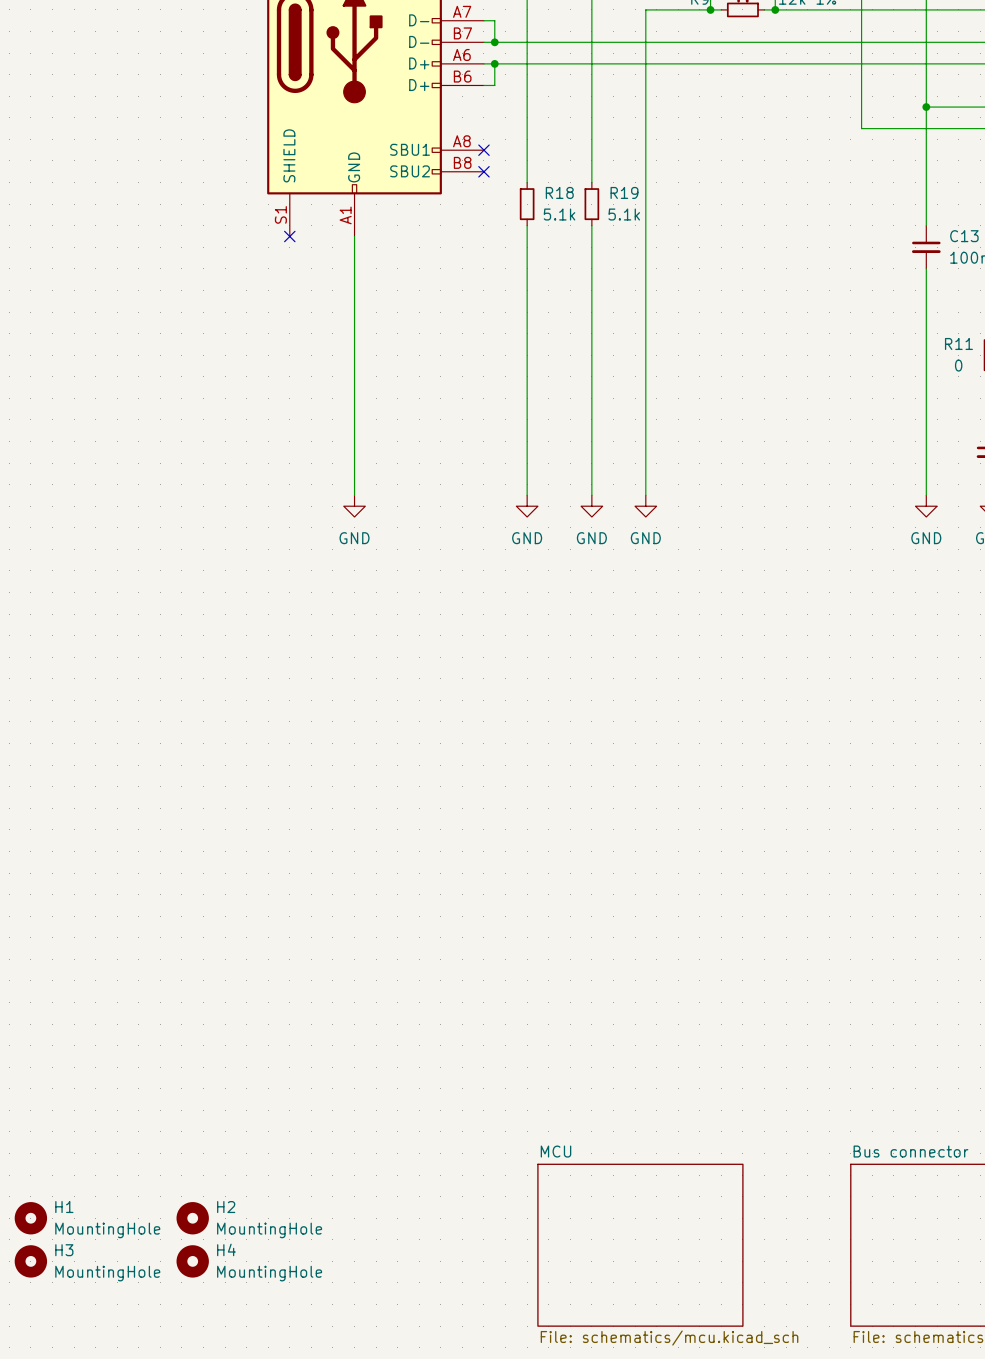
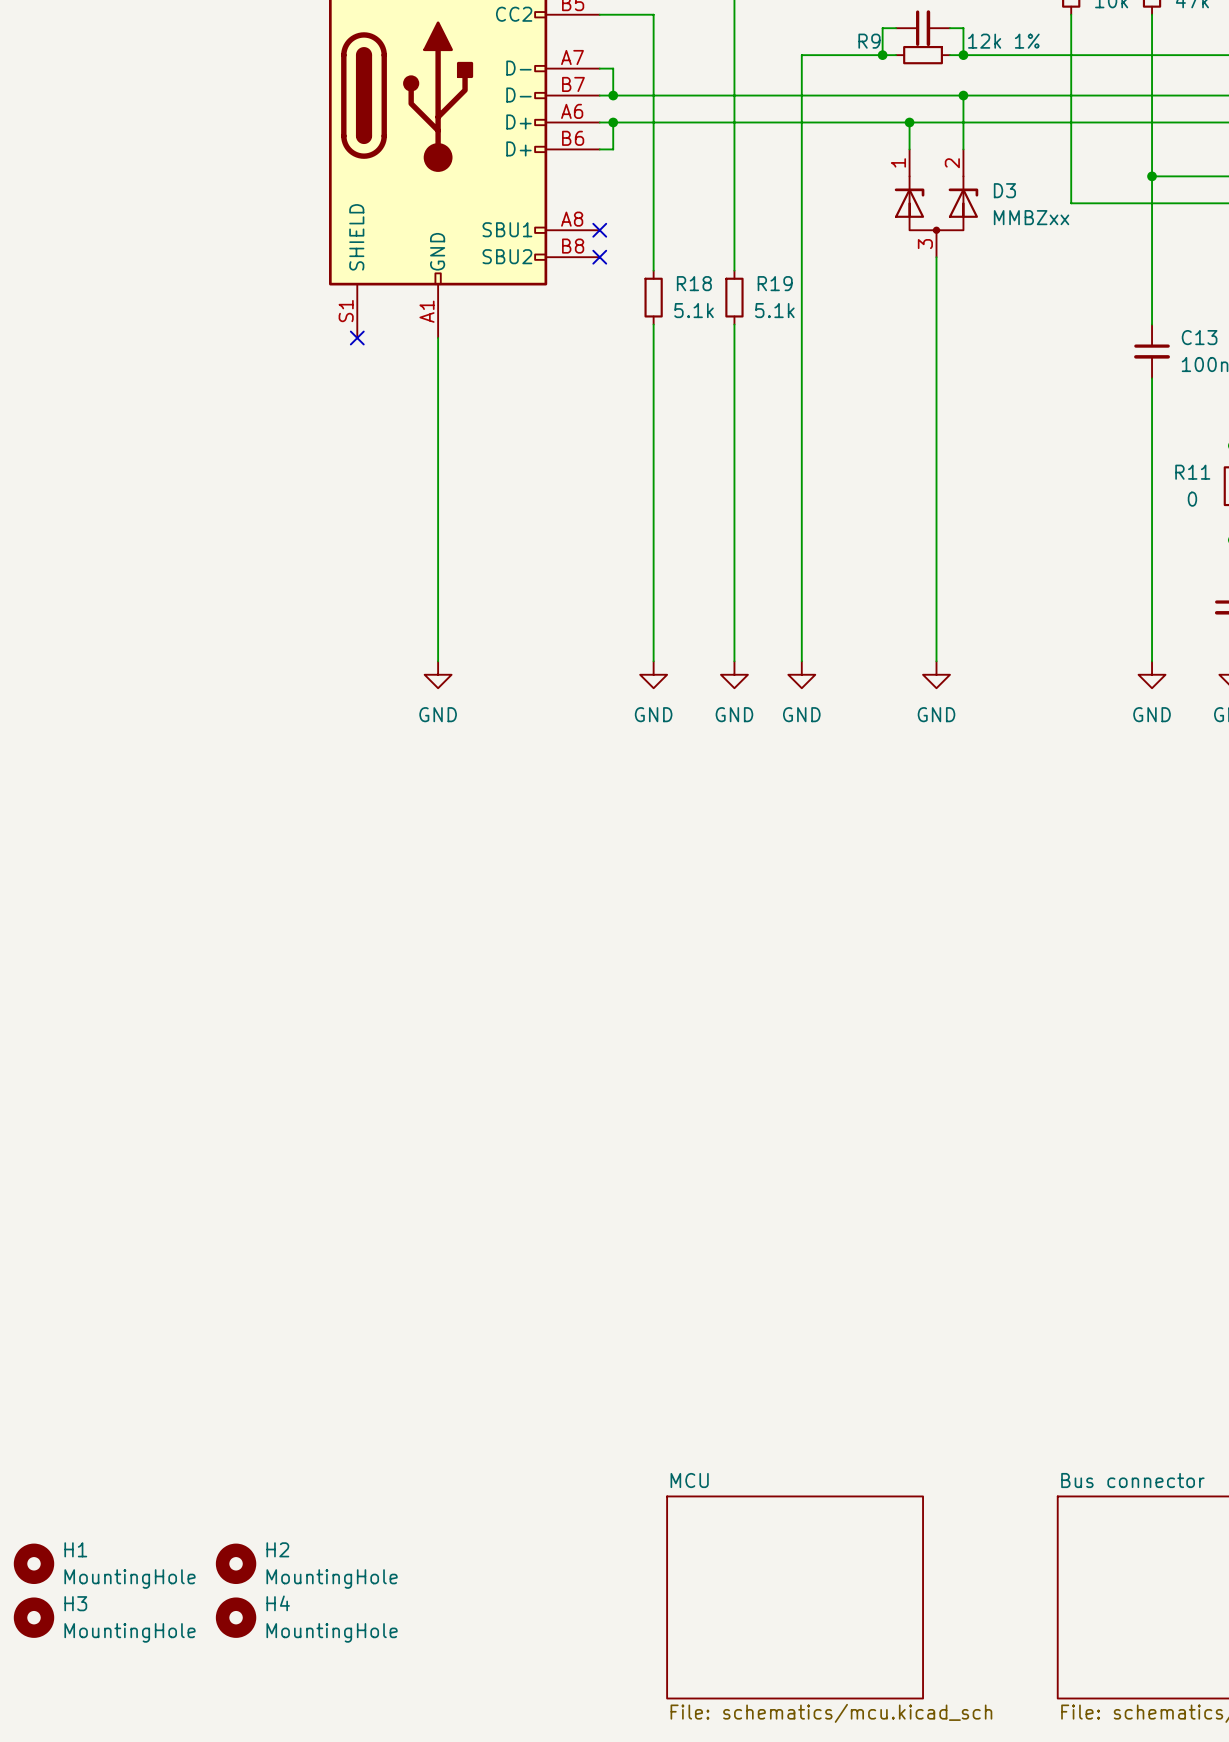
wire: none -> (963, 95) (963, 149)
junction: none -> (963, 95)
wire: none -> (909, 122) (909, 149)
junction: none -> (909, 122)
D3: none -> MMBZxx (936, 203)
wire: none -> (936, 257) (936, 661)
power symbol: none -> GND (936, 674)

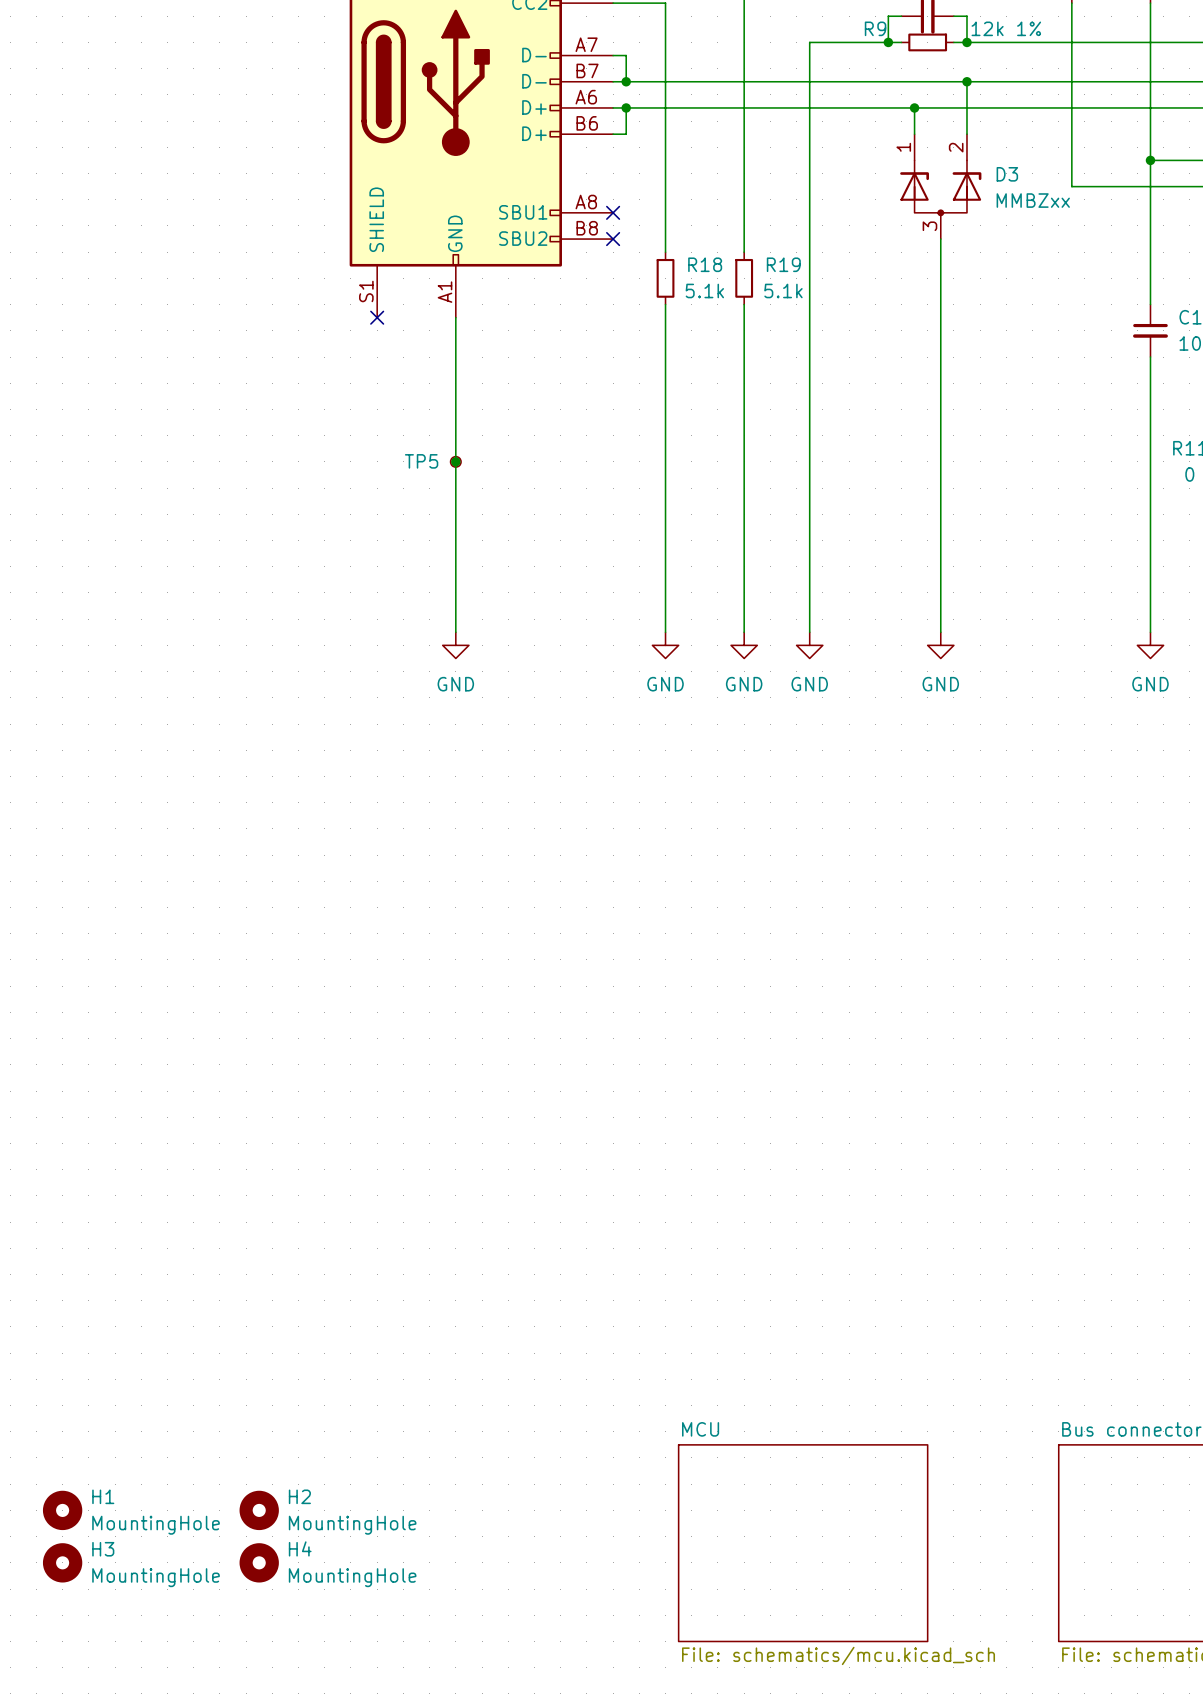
junction: none -> (455, 461)
TP5: none -> (455, 461)

